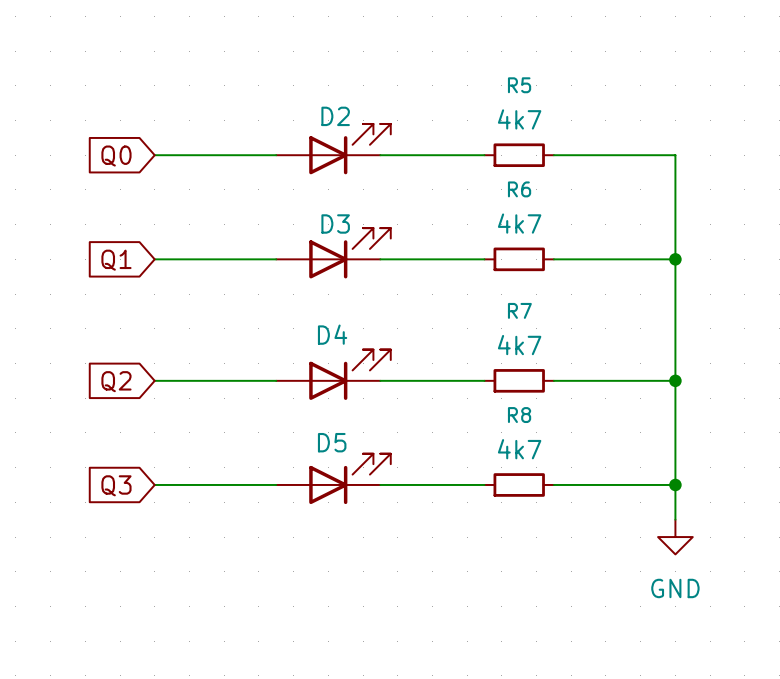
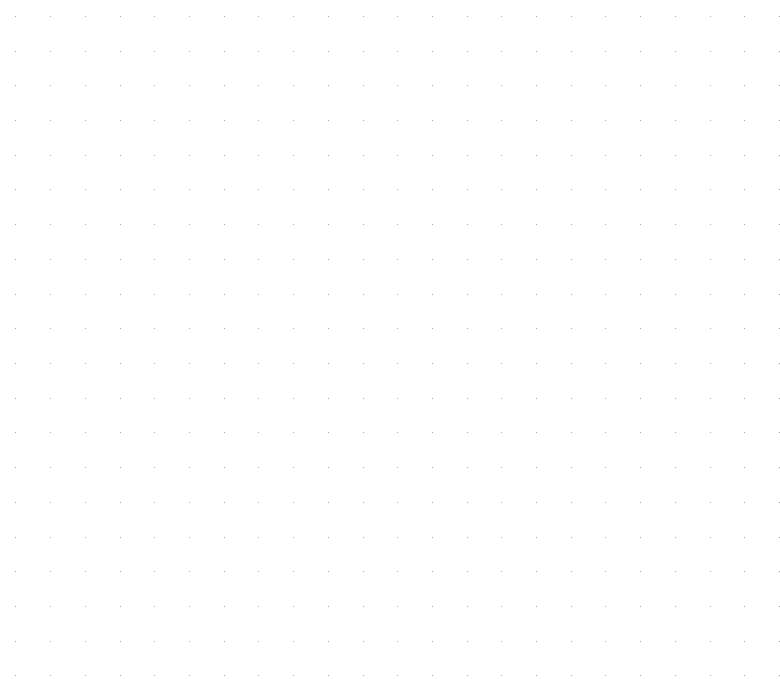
D2: (333, 149) -> none
wire: (154, 155) (276, 155) -> none
wire: (380, 155) (484, 155) -> none
R5: 4k7 (519, 155) -> none
wire: (553, 155) (675, 155) (675, 519) -> none
global label: Q0 (116, 156) -> none
D3: (333, 253) -> none
wire: (154, 259) (276, 259) -> none
wire: (380, 259) (484, 259) -> none
R6: 4k7 (519, 259) -> none
wire: (553, 259) (675, 259) -> none
junction: (675, 259) -> none
global label: Q1 (116, 260) -> none
D4: (333, 374) -> none
wire: (154, 380) (276, 380) -> none
wire: (380, 380) (484, 380) -> none
R7: 4k7 (519, 380) -> none
wire: (553, 380) (675, 380) -> none
junction: (675, 380) -> none
global label: Q2 (116, 381) -> none
D5: (333, 478) -> none
wire: (154, 484) (276, 484) -> none
wire: (380, 484) (484, 484) -> none
R8: 4k7 (519, 484) -> none
wire: (553, 484) (675, 484) -> none
junction: (675, 484) -> none
global label: Q3 (116, 485) -> none
power symbol: GND (675, 537) -> none

